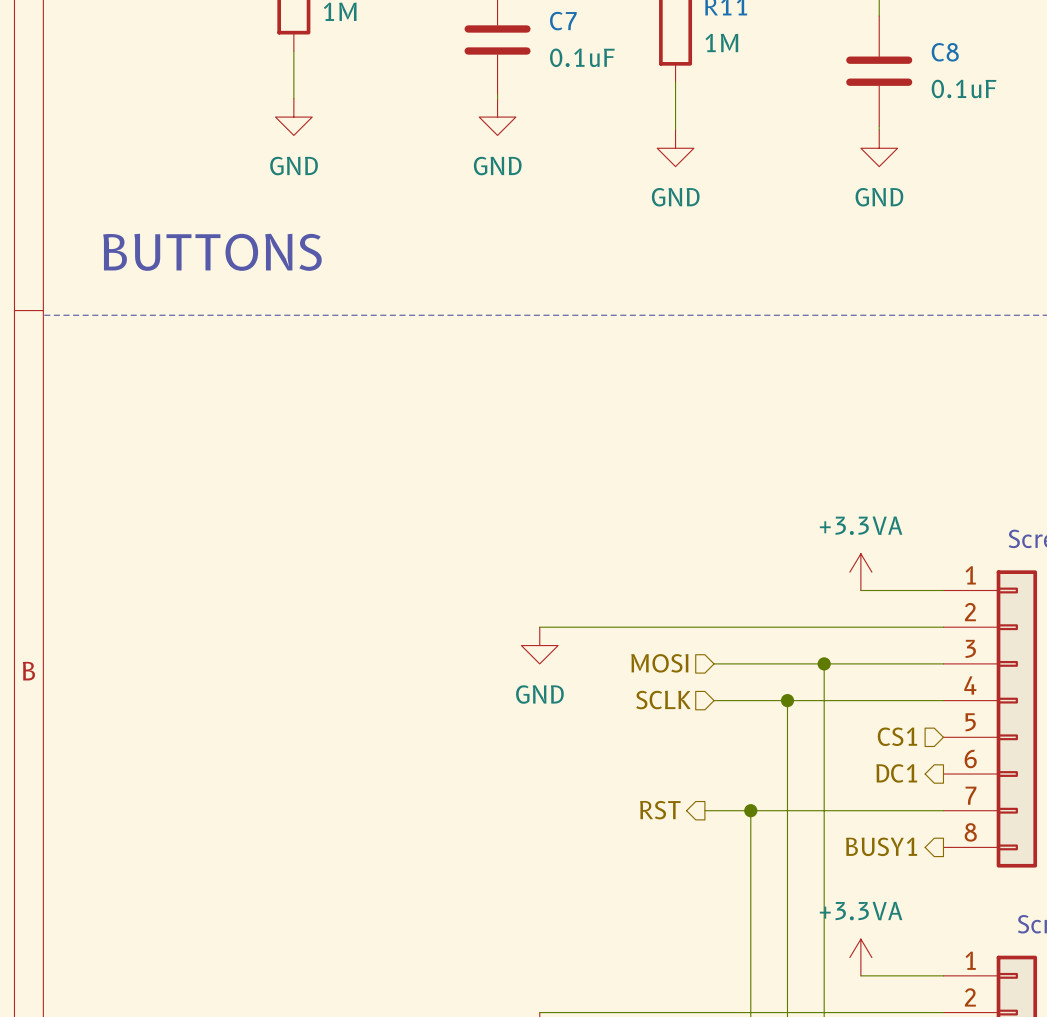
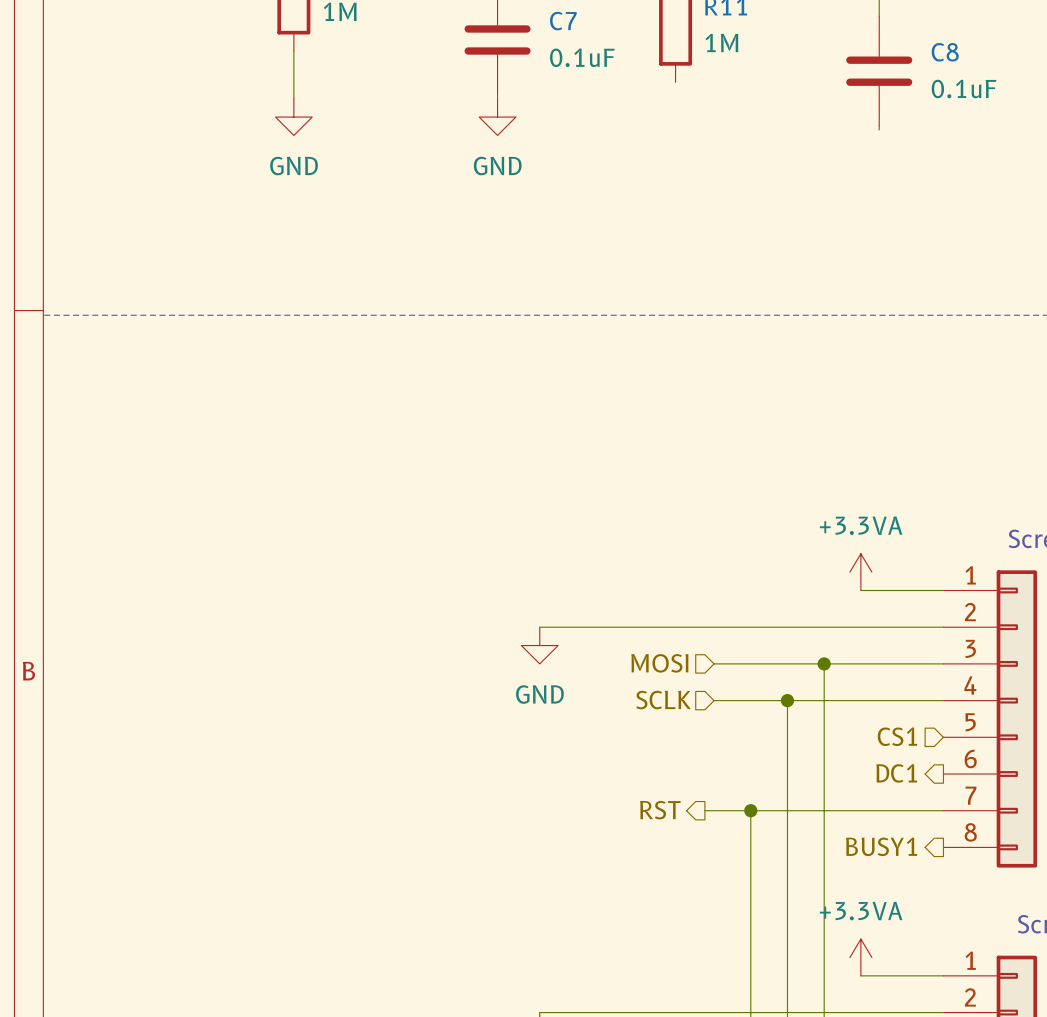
wire: (675, 82) (675, 129) -> none
power symbol: GND (675, 148) -> none
power symbol: GND (879, 148) -> none
text: BUTTONS (212, 252) -> none

